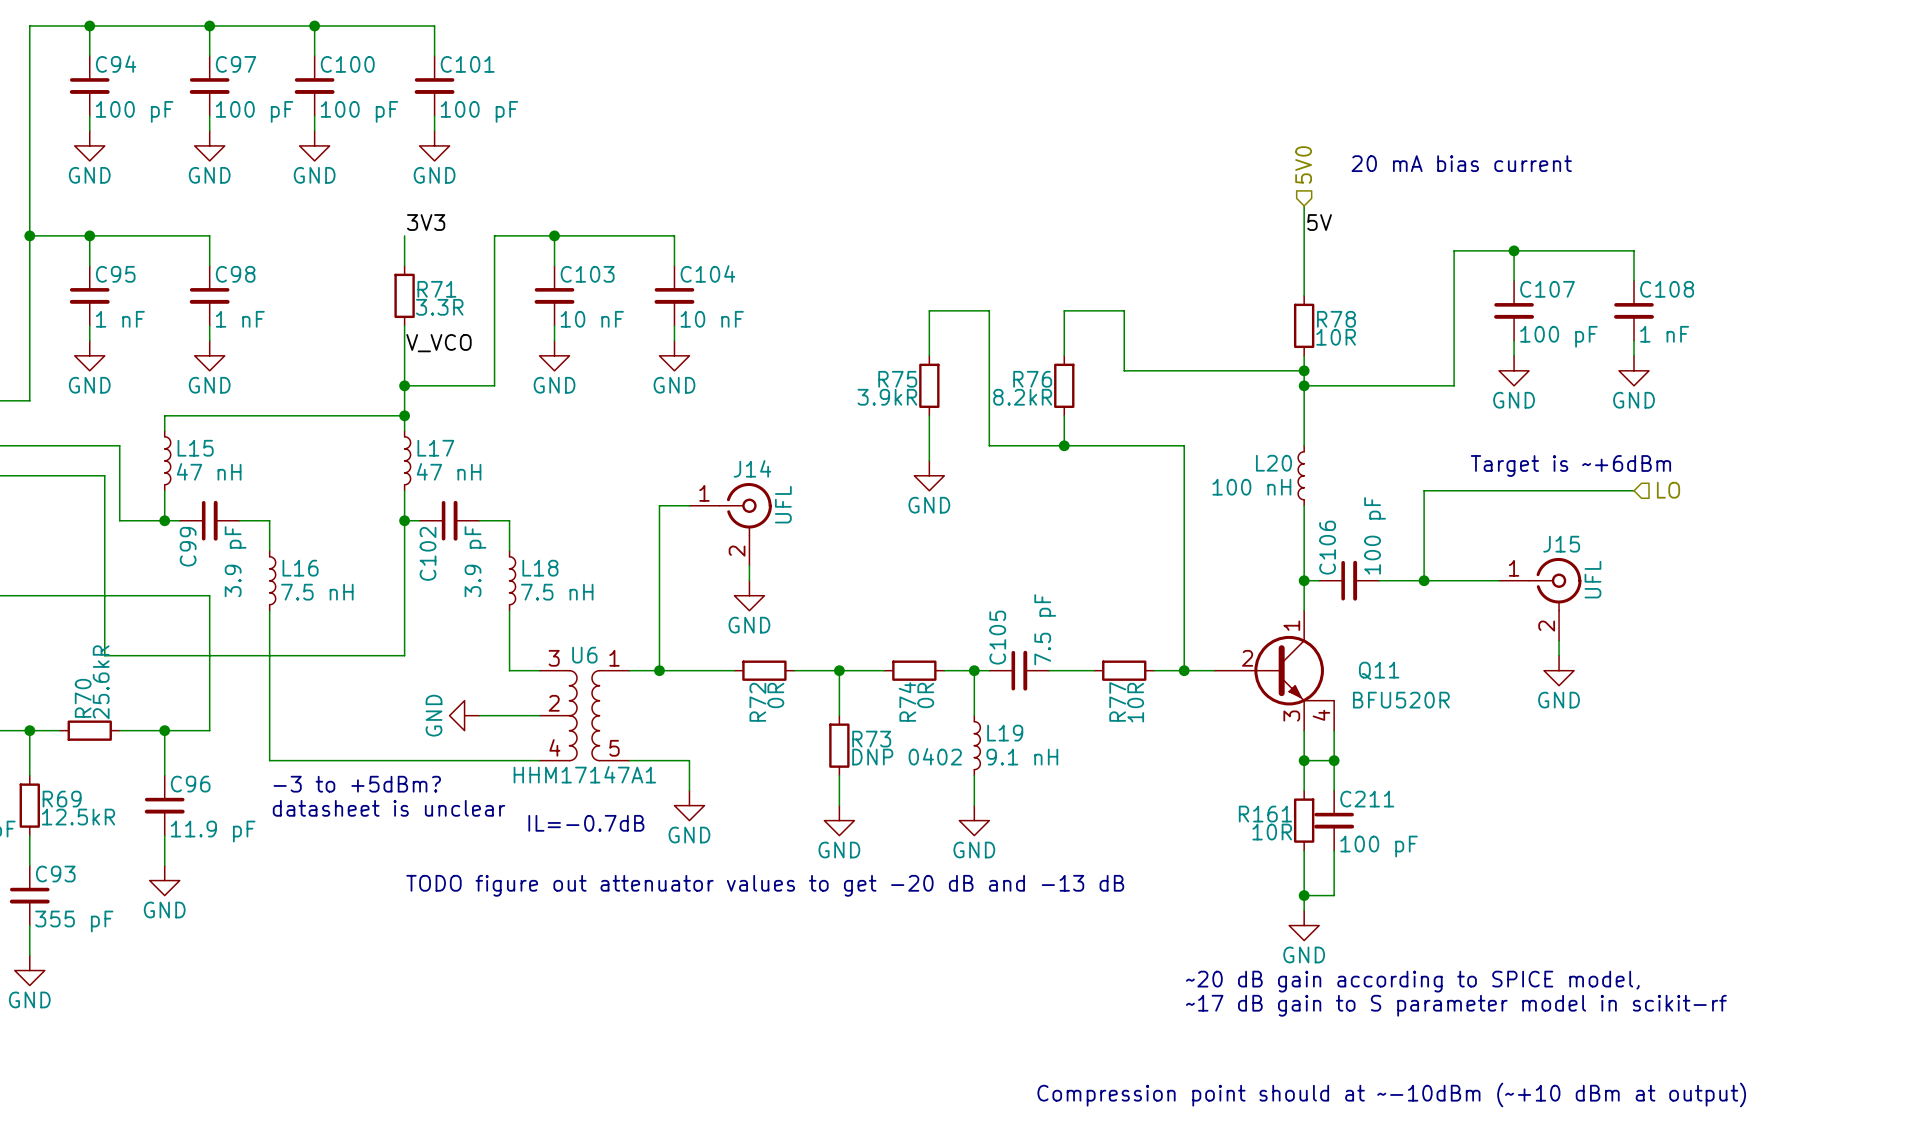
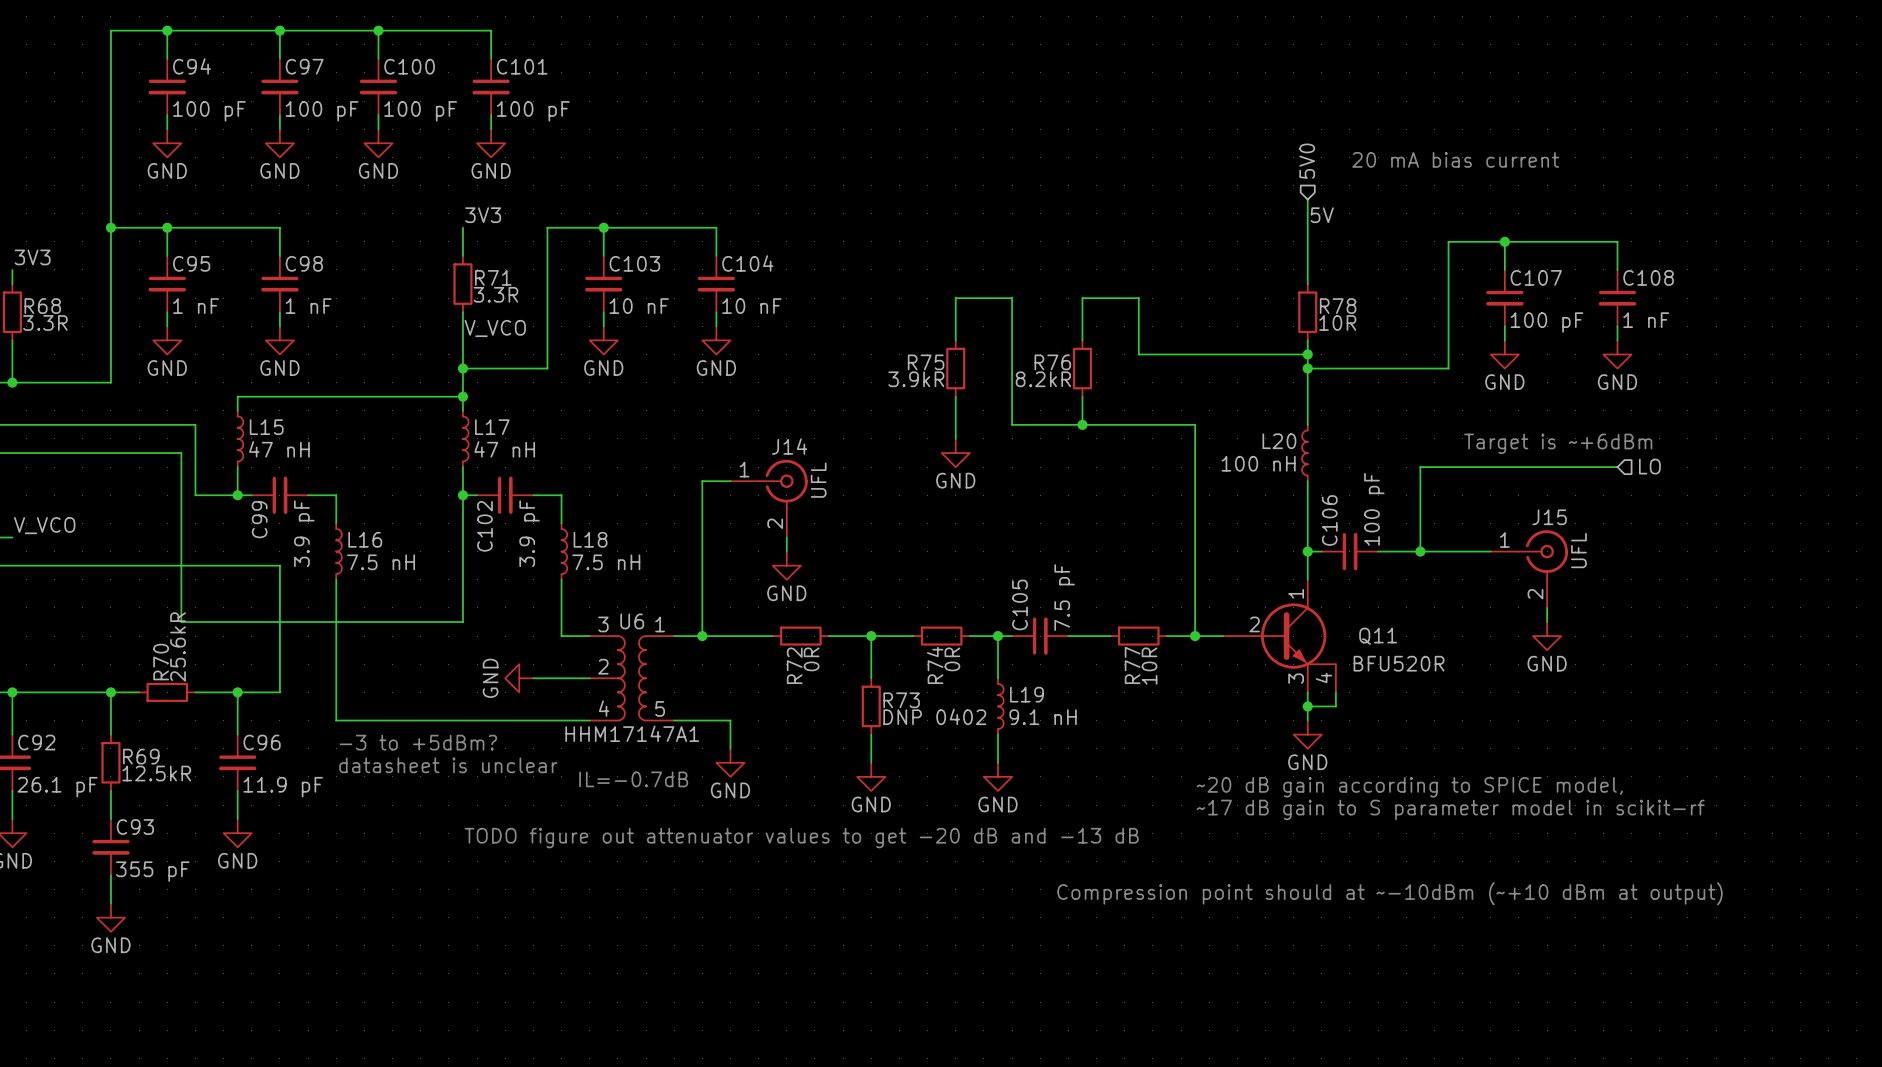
wire: (1334, 745) (1334, 790) -> (1335, 706) (1307, 706)
junction position: (1304, 760) -> (1307, 706)
wire: (1334, 760) (1304, 760) (1304, 790) -> none
junction: (1334, 760) -> none
R161: 10R (1304, 820) -> none
C211: 100 pF (1334, 820) -> none
wire: (1304, 850) (1304, 910) -> none
wire: (1334, 850) (1334, 895) (1304, 895) -> none
junction: (1304, 895) -> none
power symbol position: GND (1304, 925) -> GND (1307, 734)
text position: ~20 dB gain according to SPICE model, (1412, 981) -> ~20 dB gain according to SPICE model, (1409, 787)
text position: ~17 dB gain to S parameter model in scikit-rf (1456, 1005) -> ~17 dB gain to S parameter model in scikit-rf (1450, 809)
text position: Compression point should at ~-10dBm (~+10 dBm at output) (1391, 1094) -> Compression point should at ~-10dBm (~+10 dBm at output) (1389, 893)

